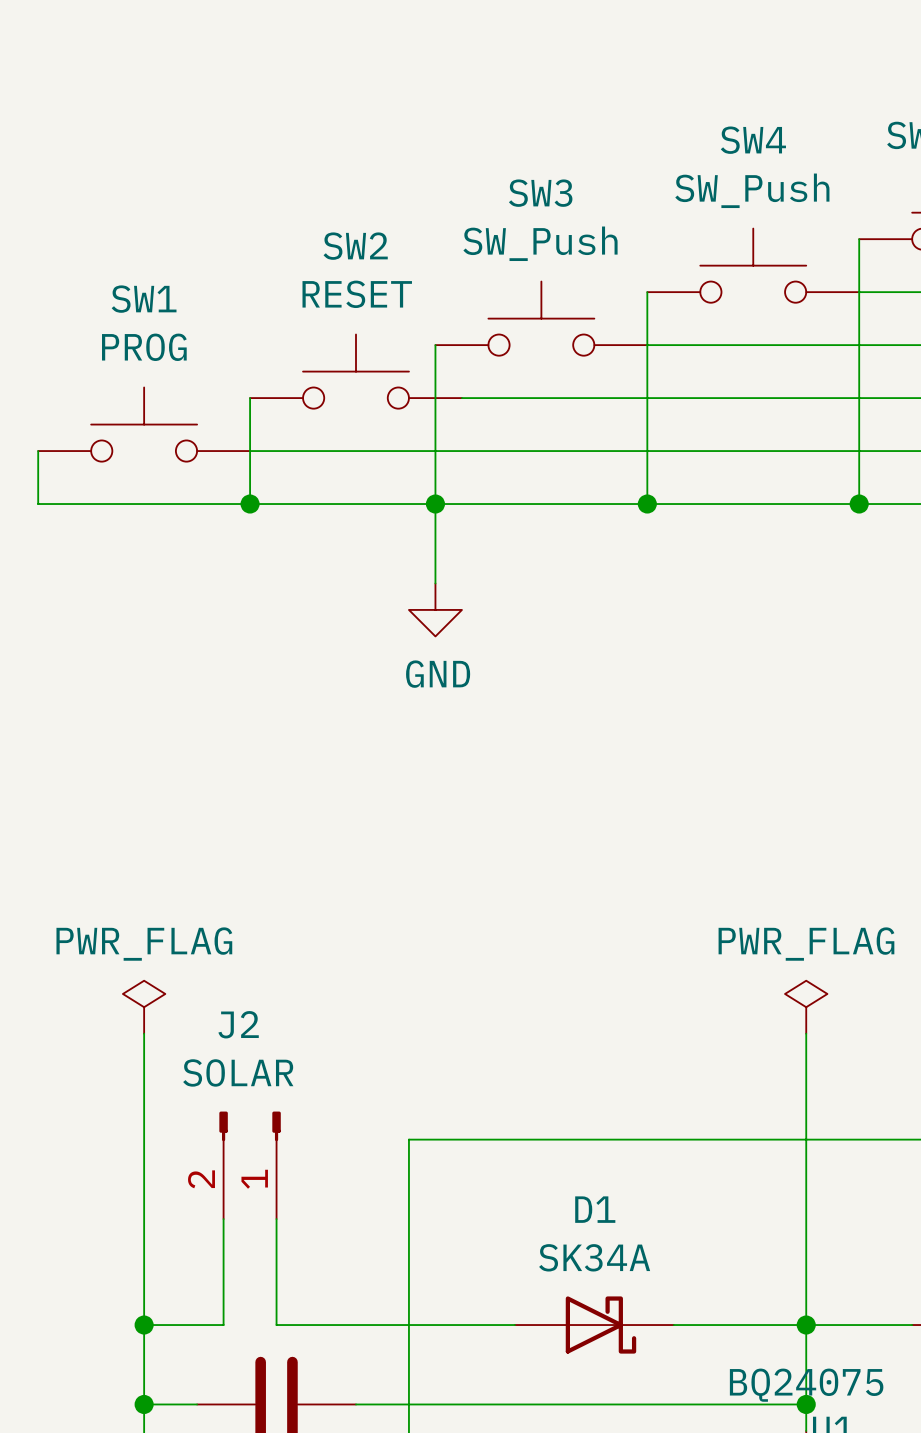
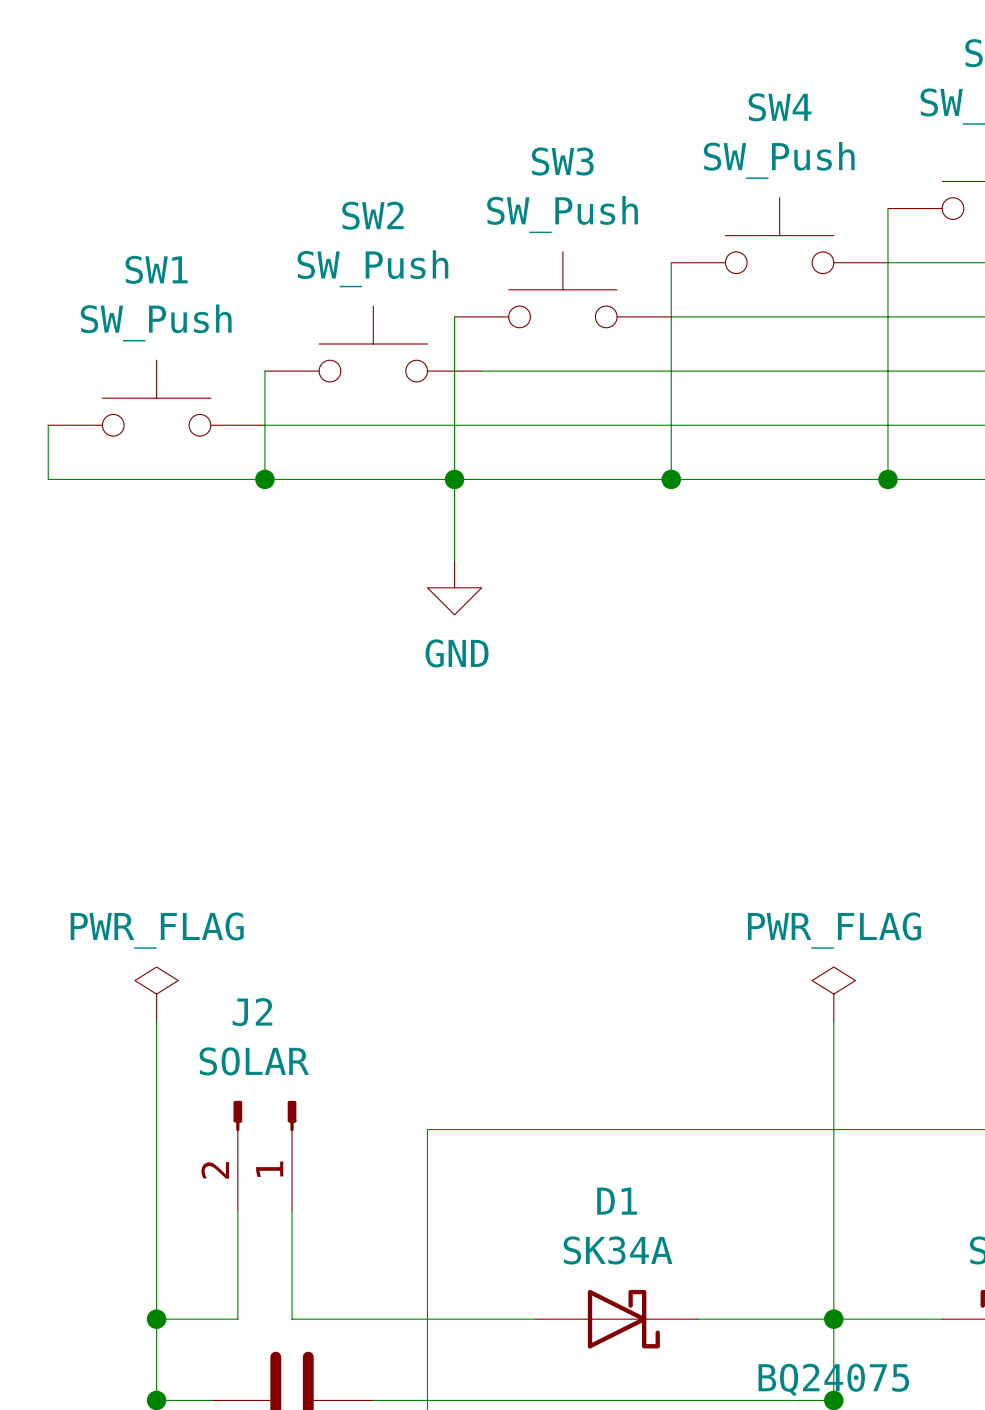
SW2 value: RESET (357, 294) -> SW_Push (372, 268)
SW1 value: PROG (144, 347) -> SW_Push (156, 322)

